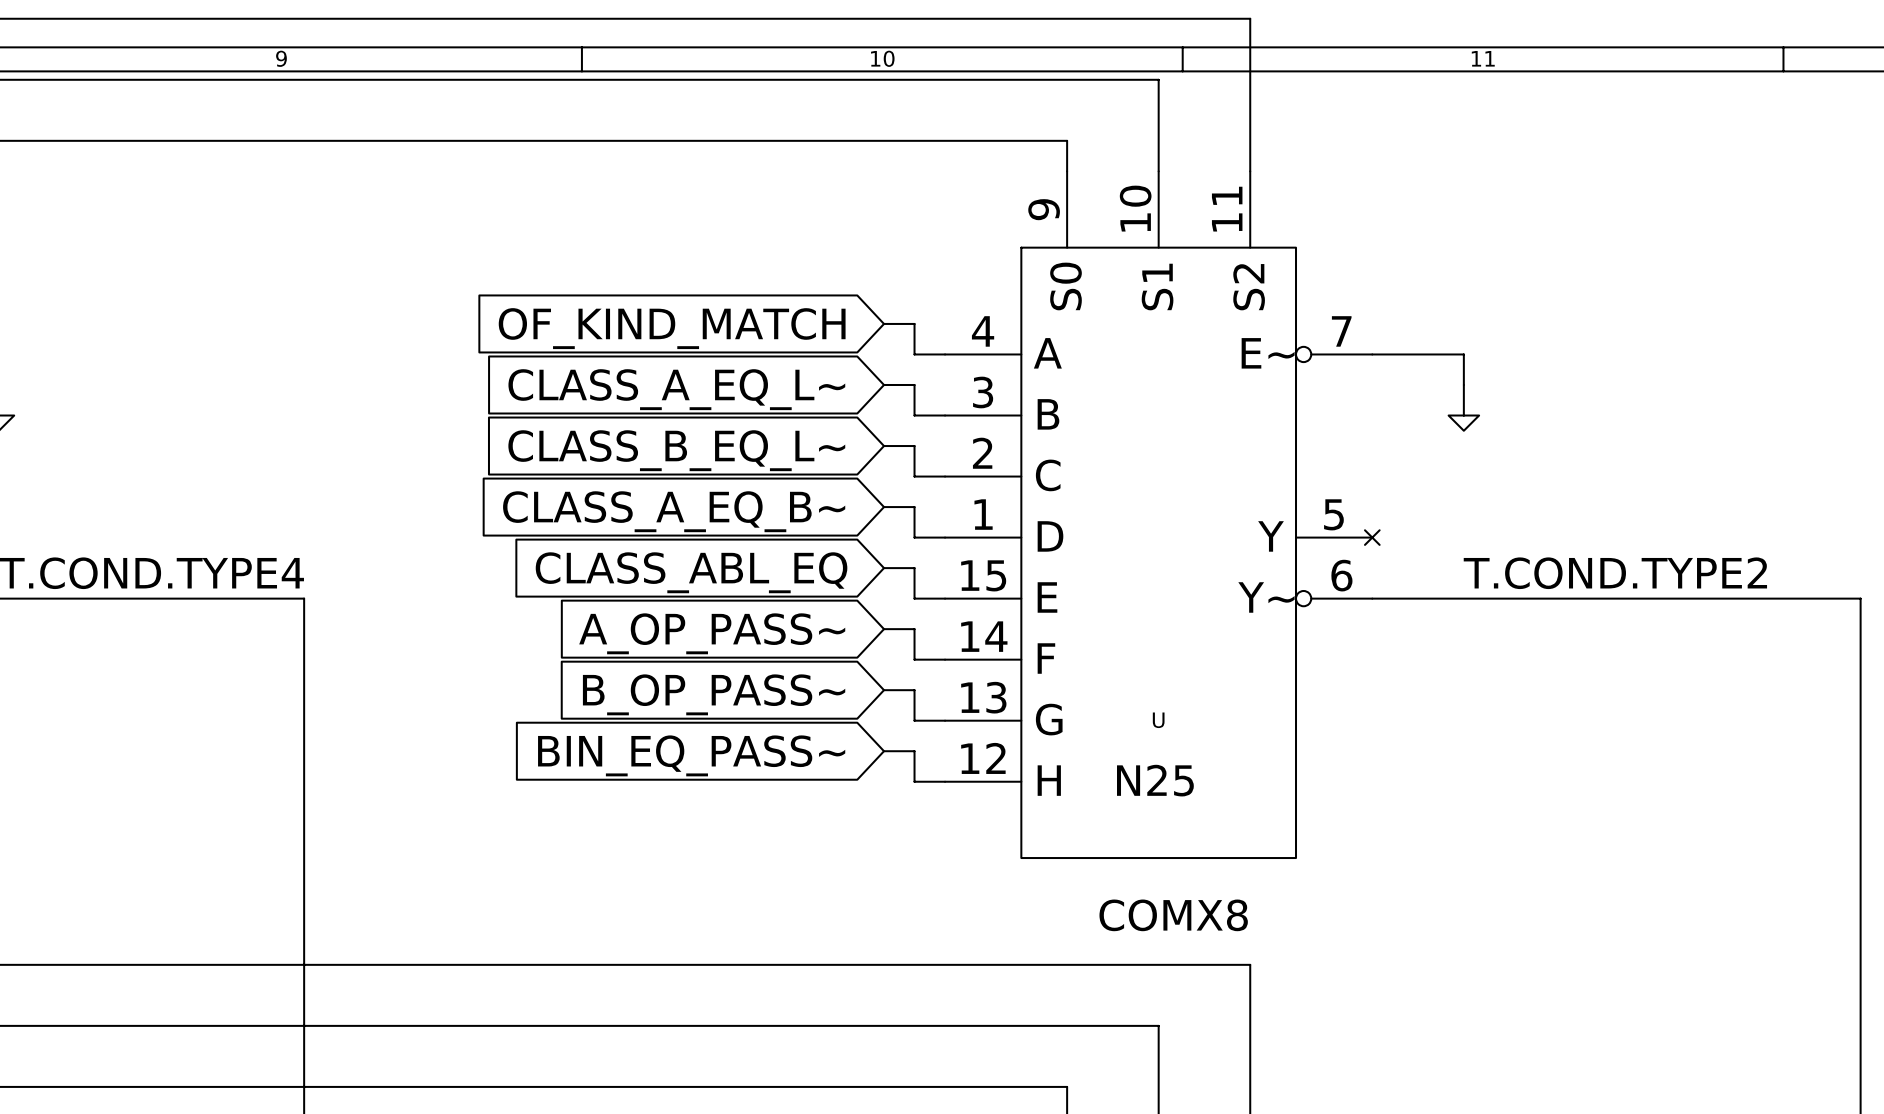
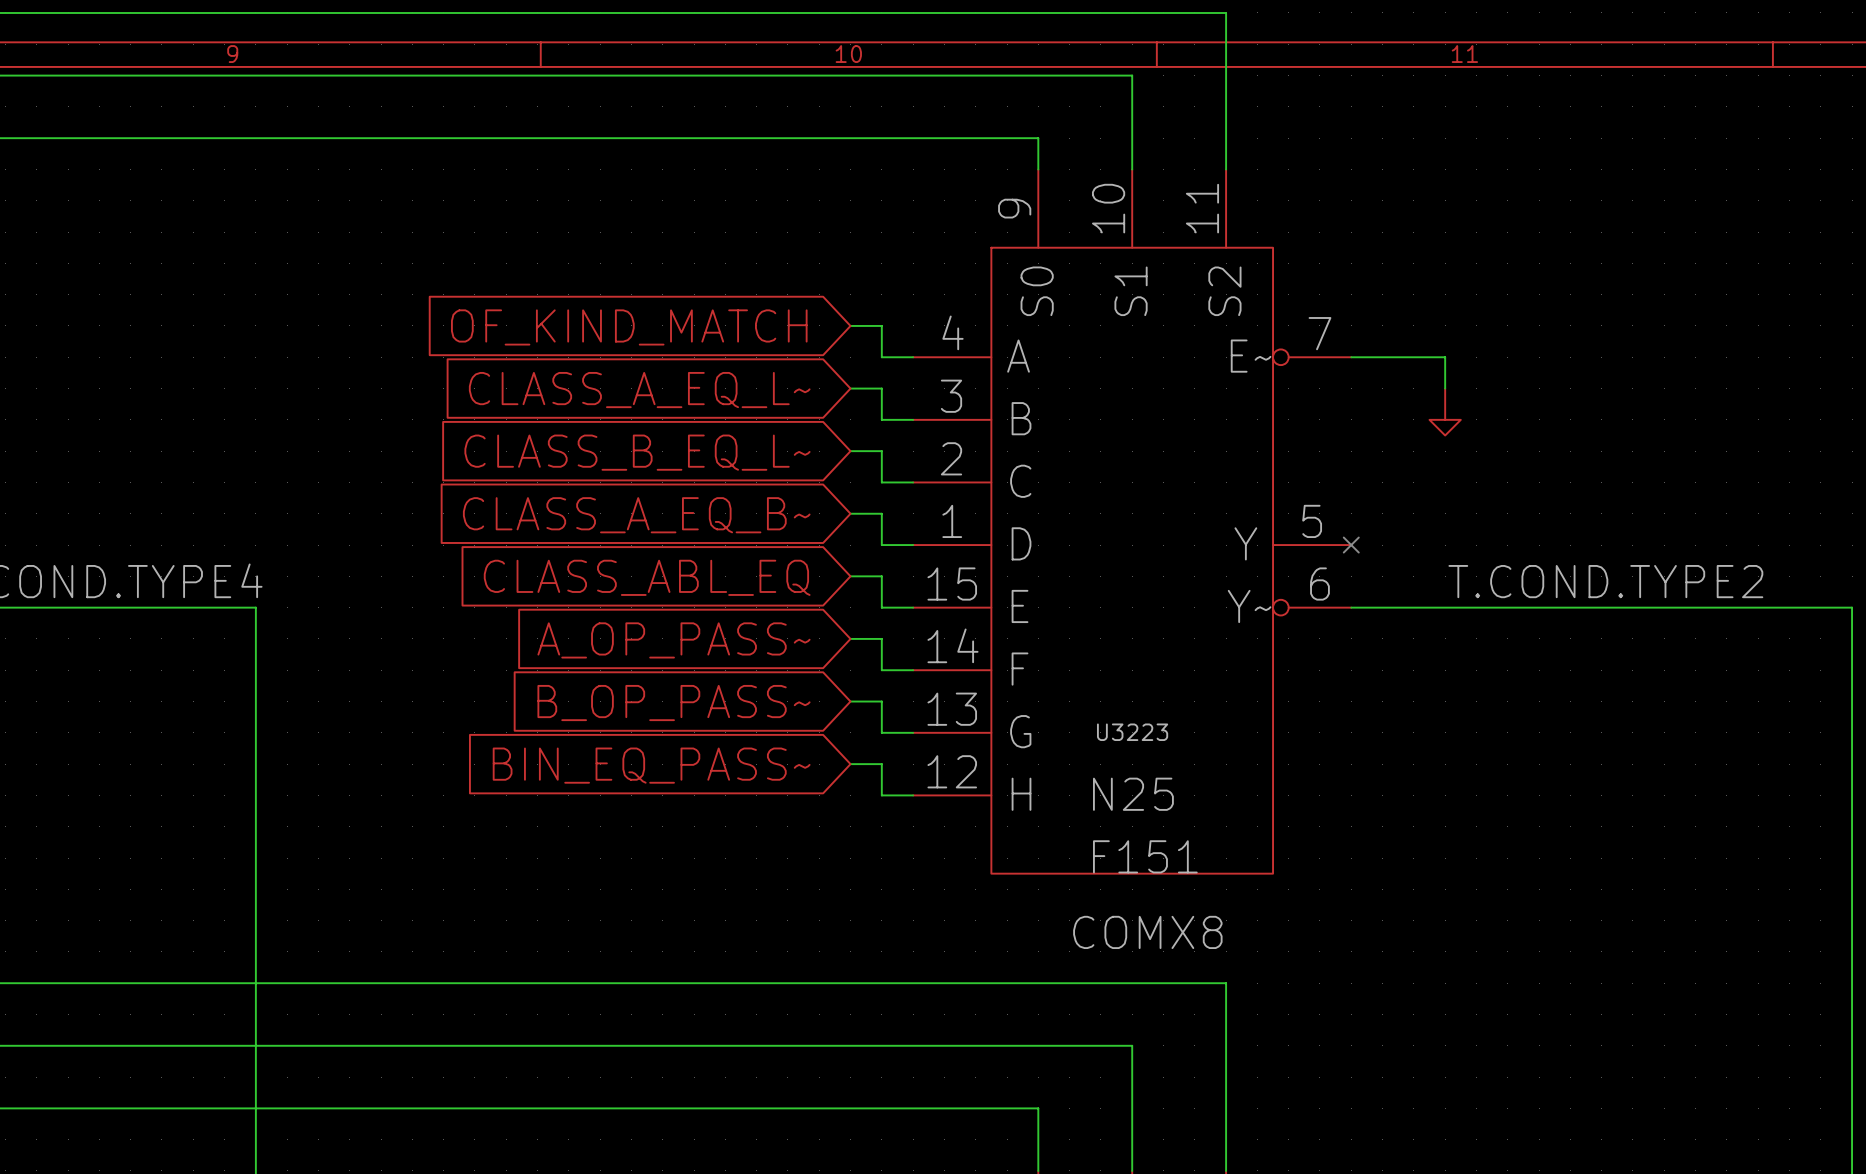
U name: U (1158, 720) -> U3223 (1132, 732)
U value: none -> F151 (1145, 856)

